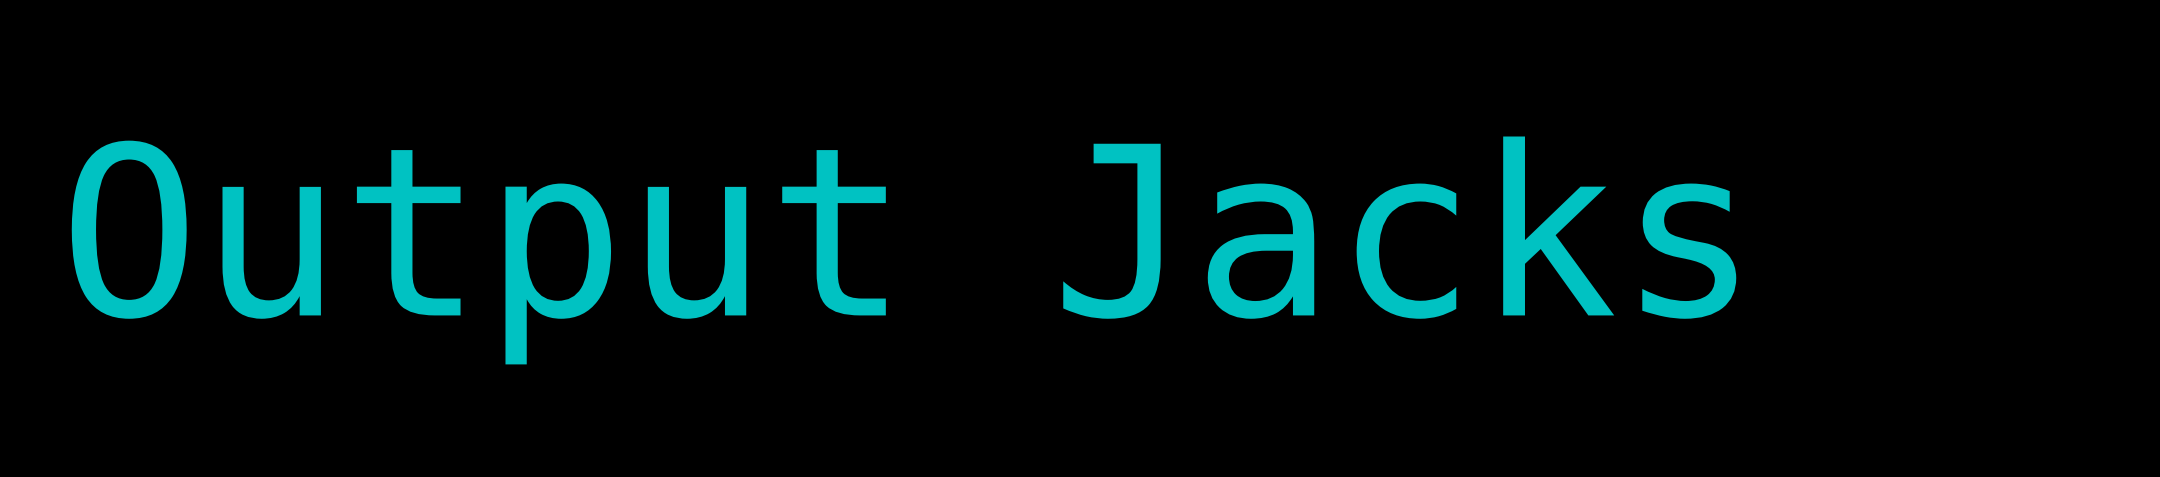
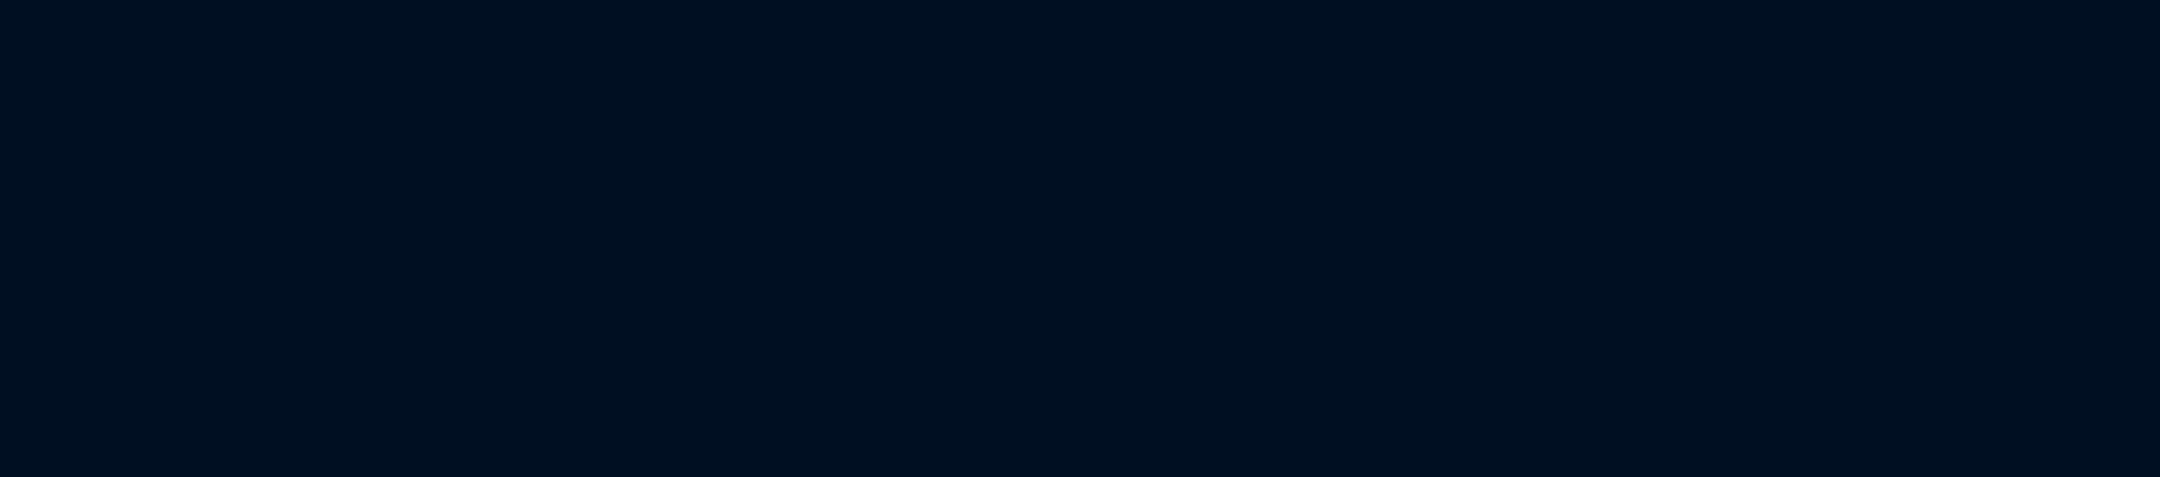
text: Output Jacks (904, 250) -> none

